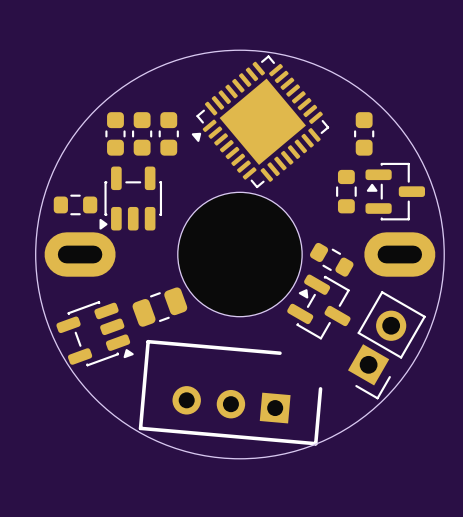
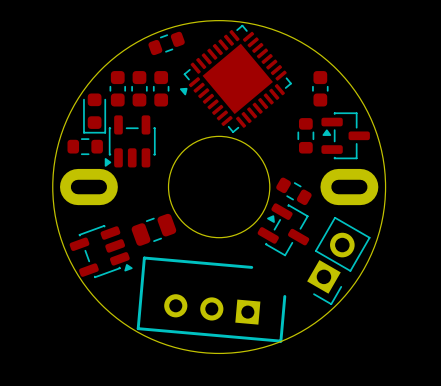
part: none -> (166, 43)
part: none -> (94, 113)

